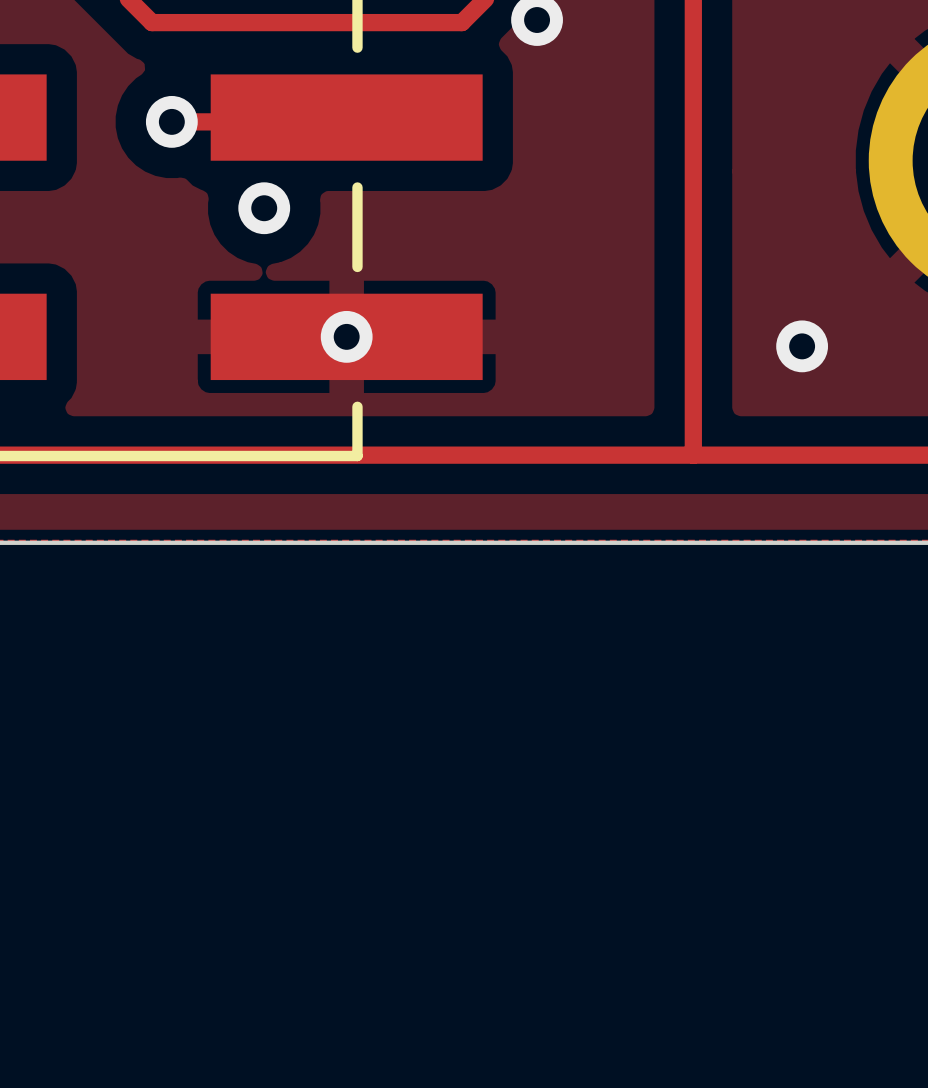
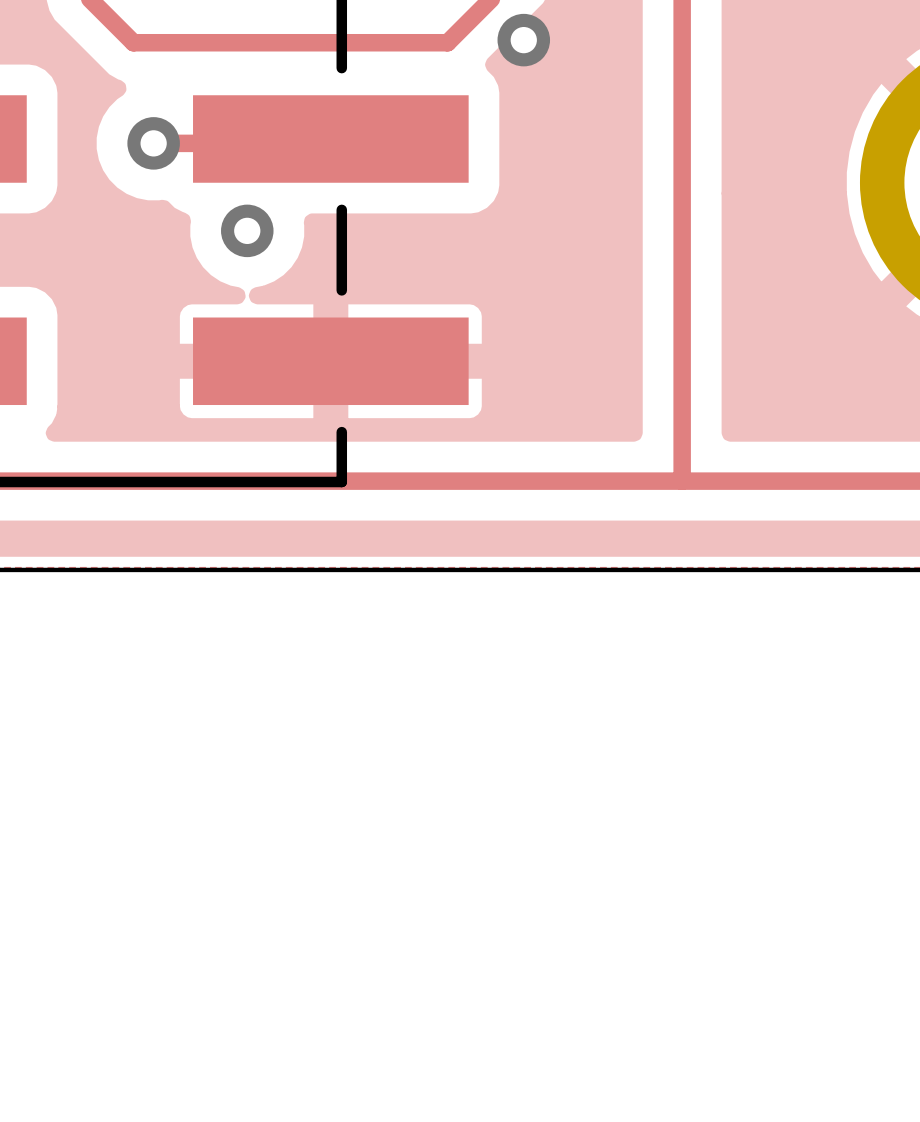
via: (346, 336) -> none
via: (802, 346) -> none

